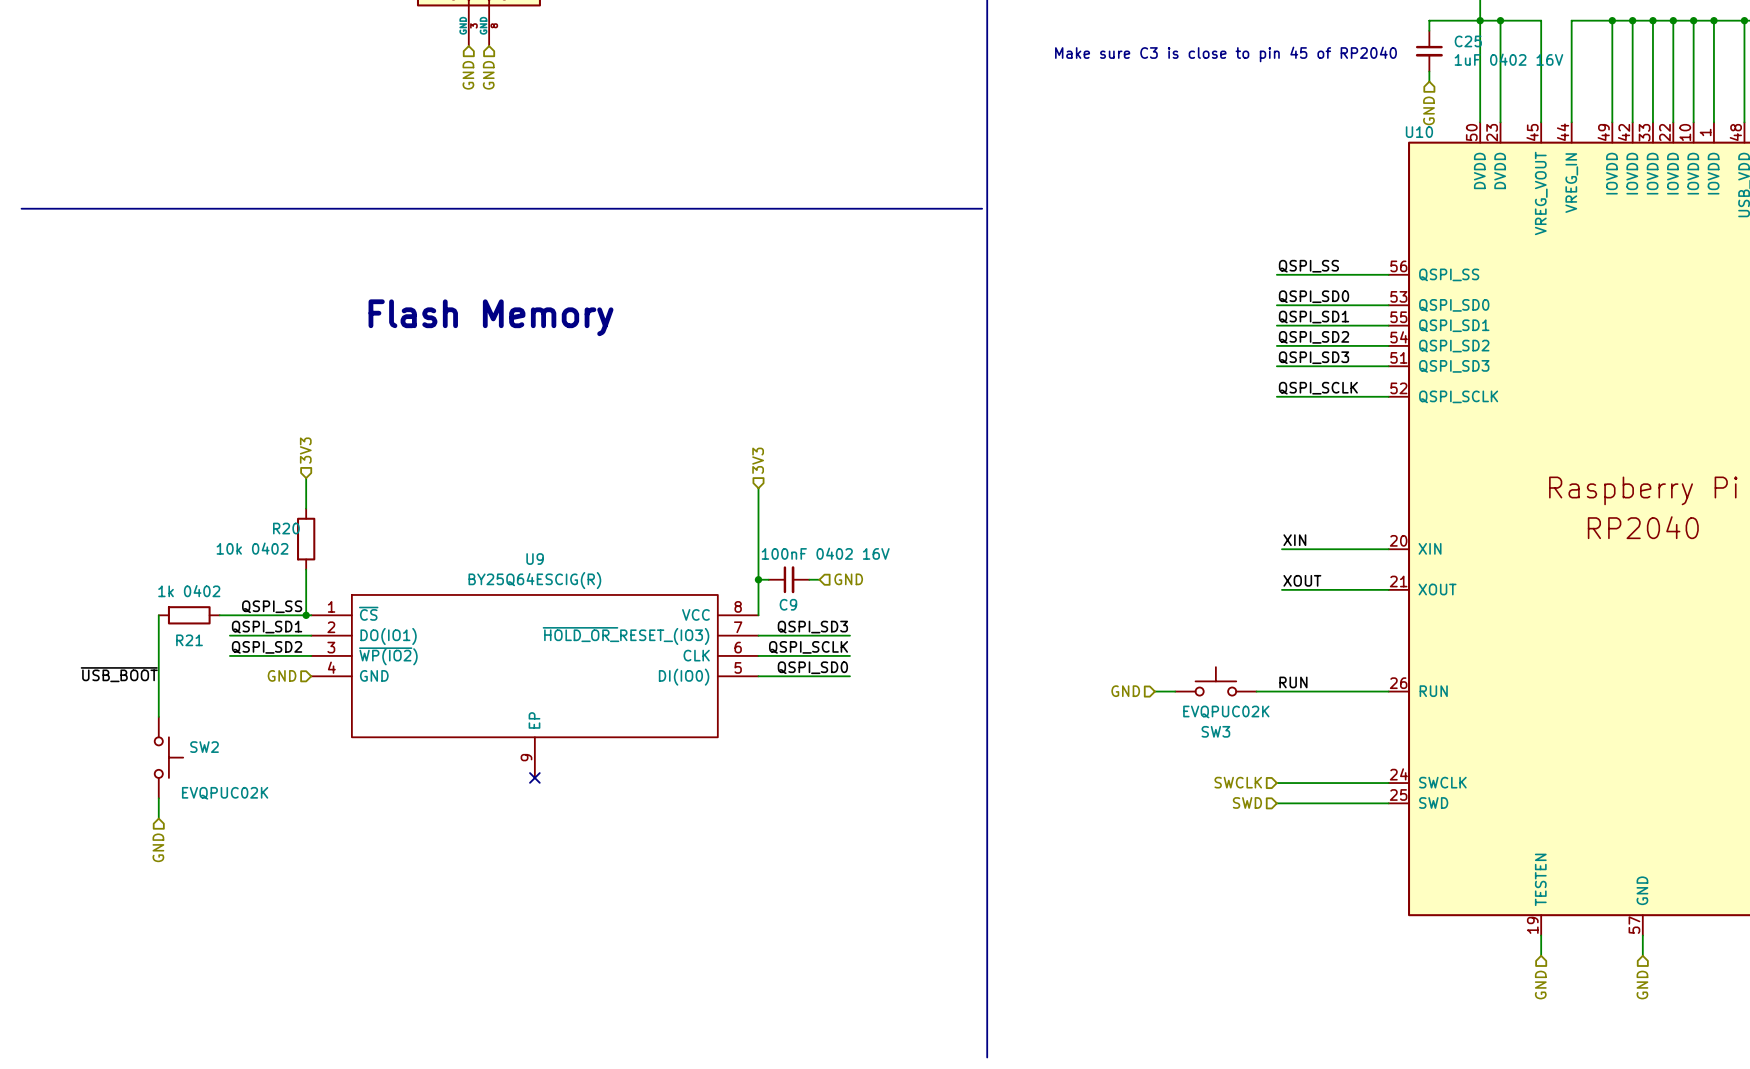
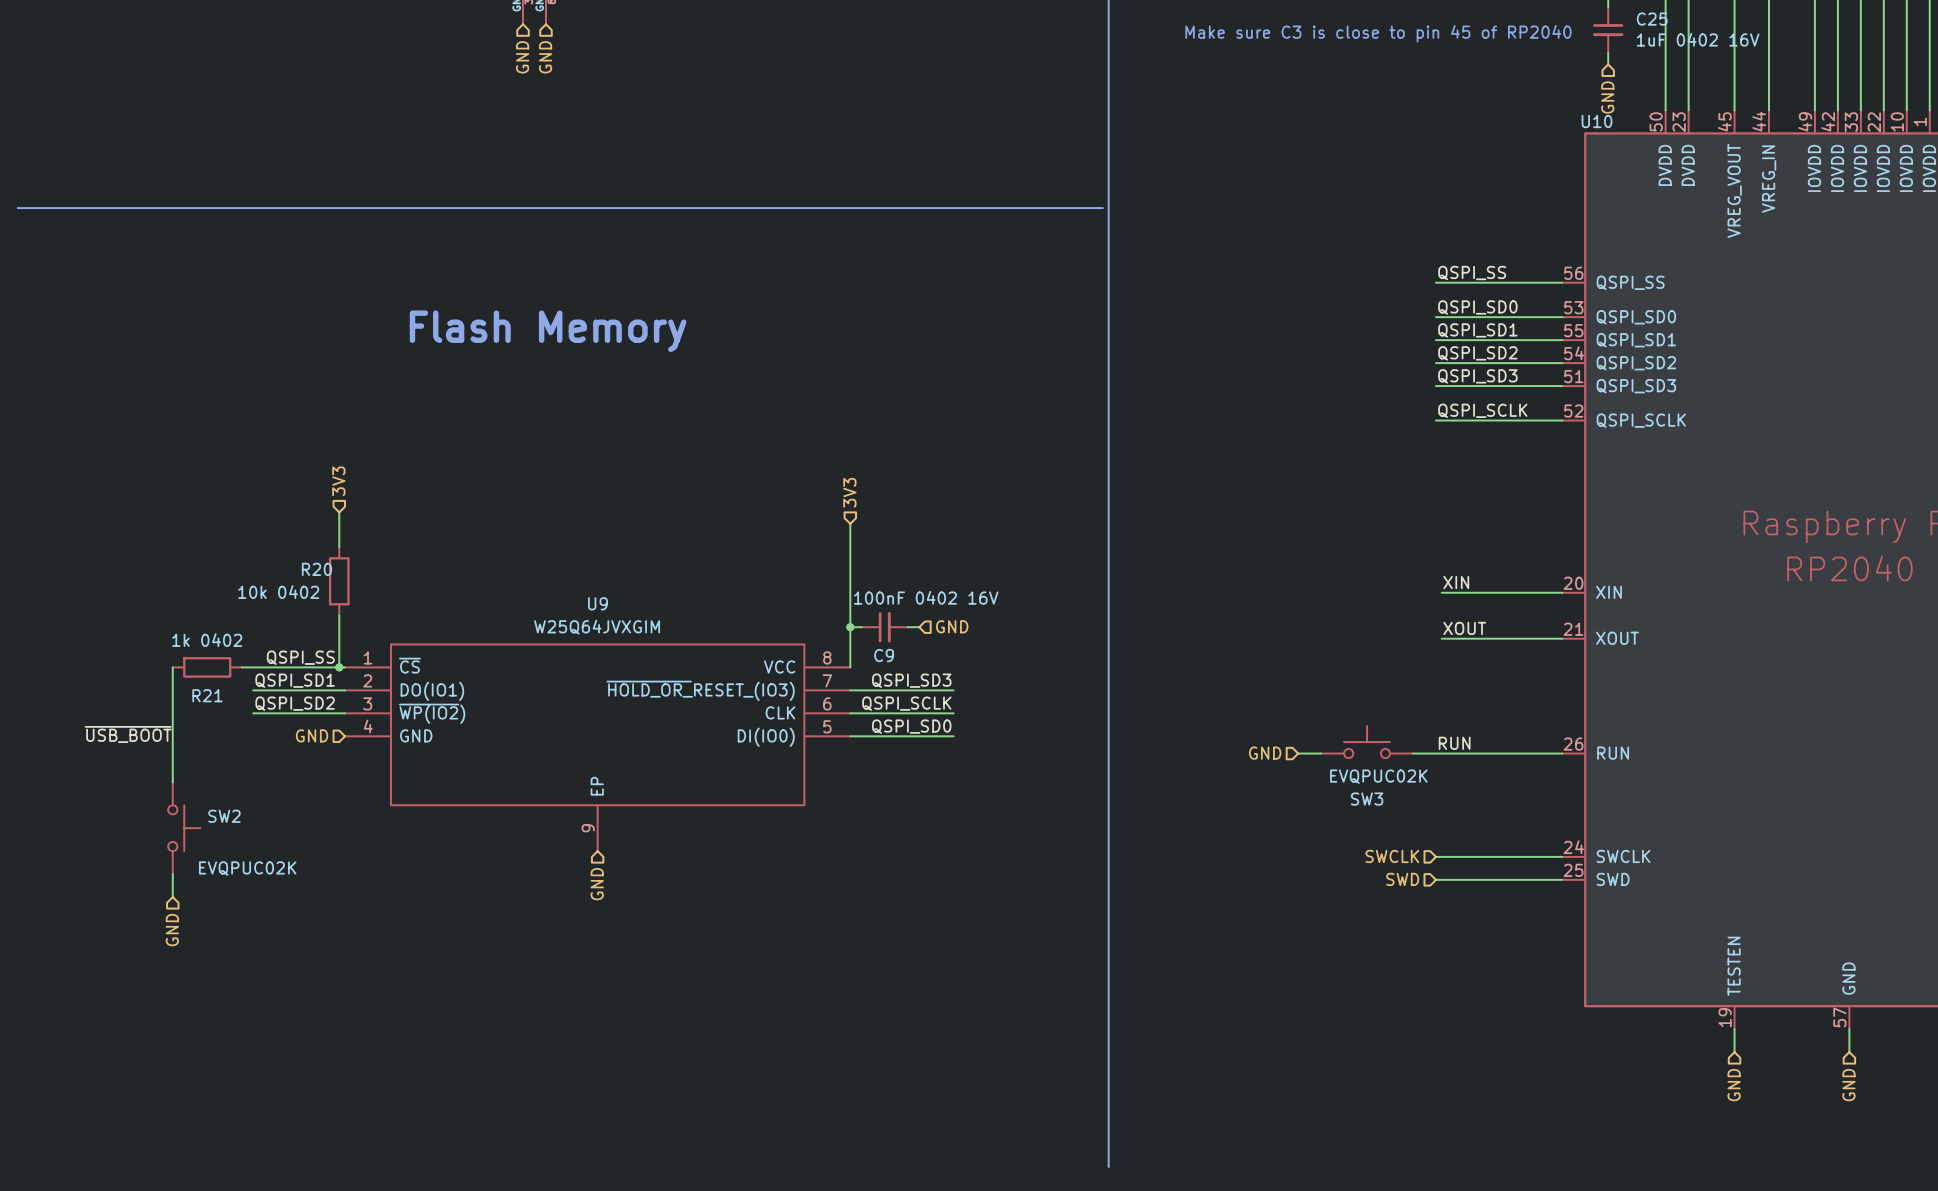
U9 value: BY25Q64ESCIG(R) (534, 580) -> W25Q64JVXGIM (597, 627)
no-connect mark: (534, 777) -> none
hierarchical label: none -> GND (597, 884)

